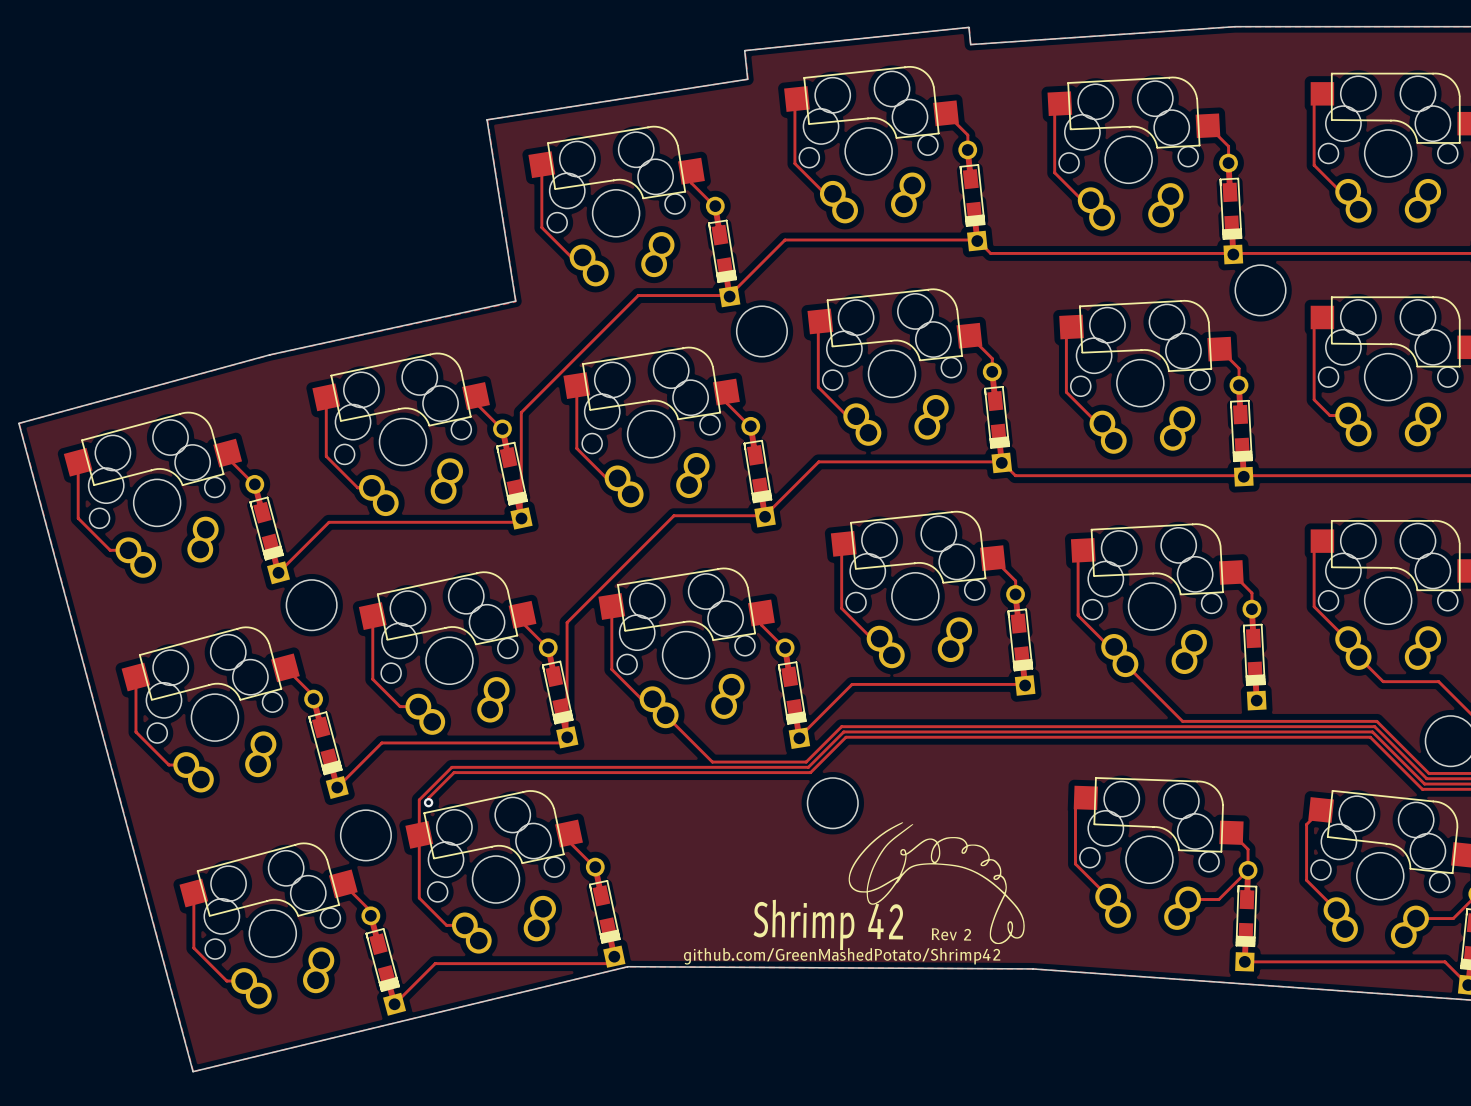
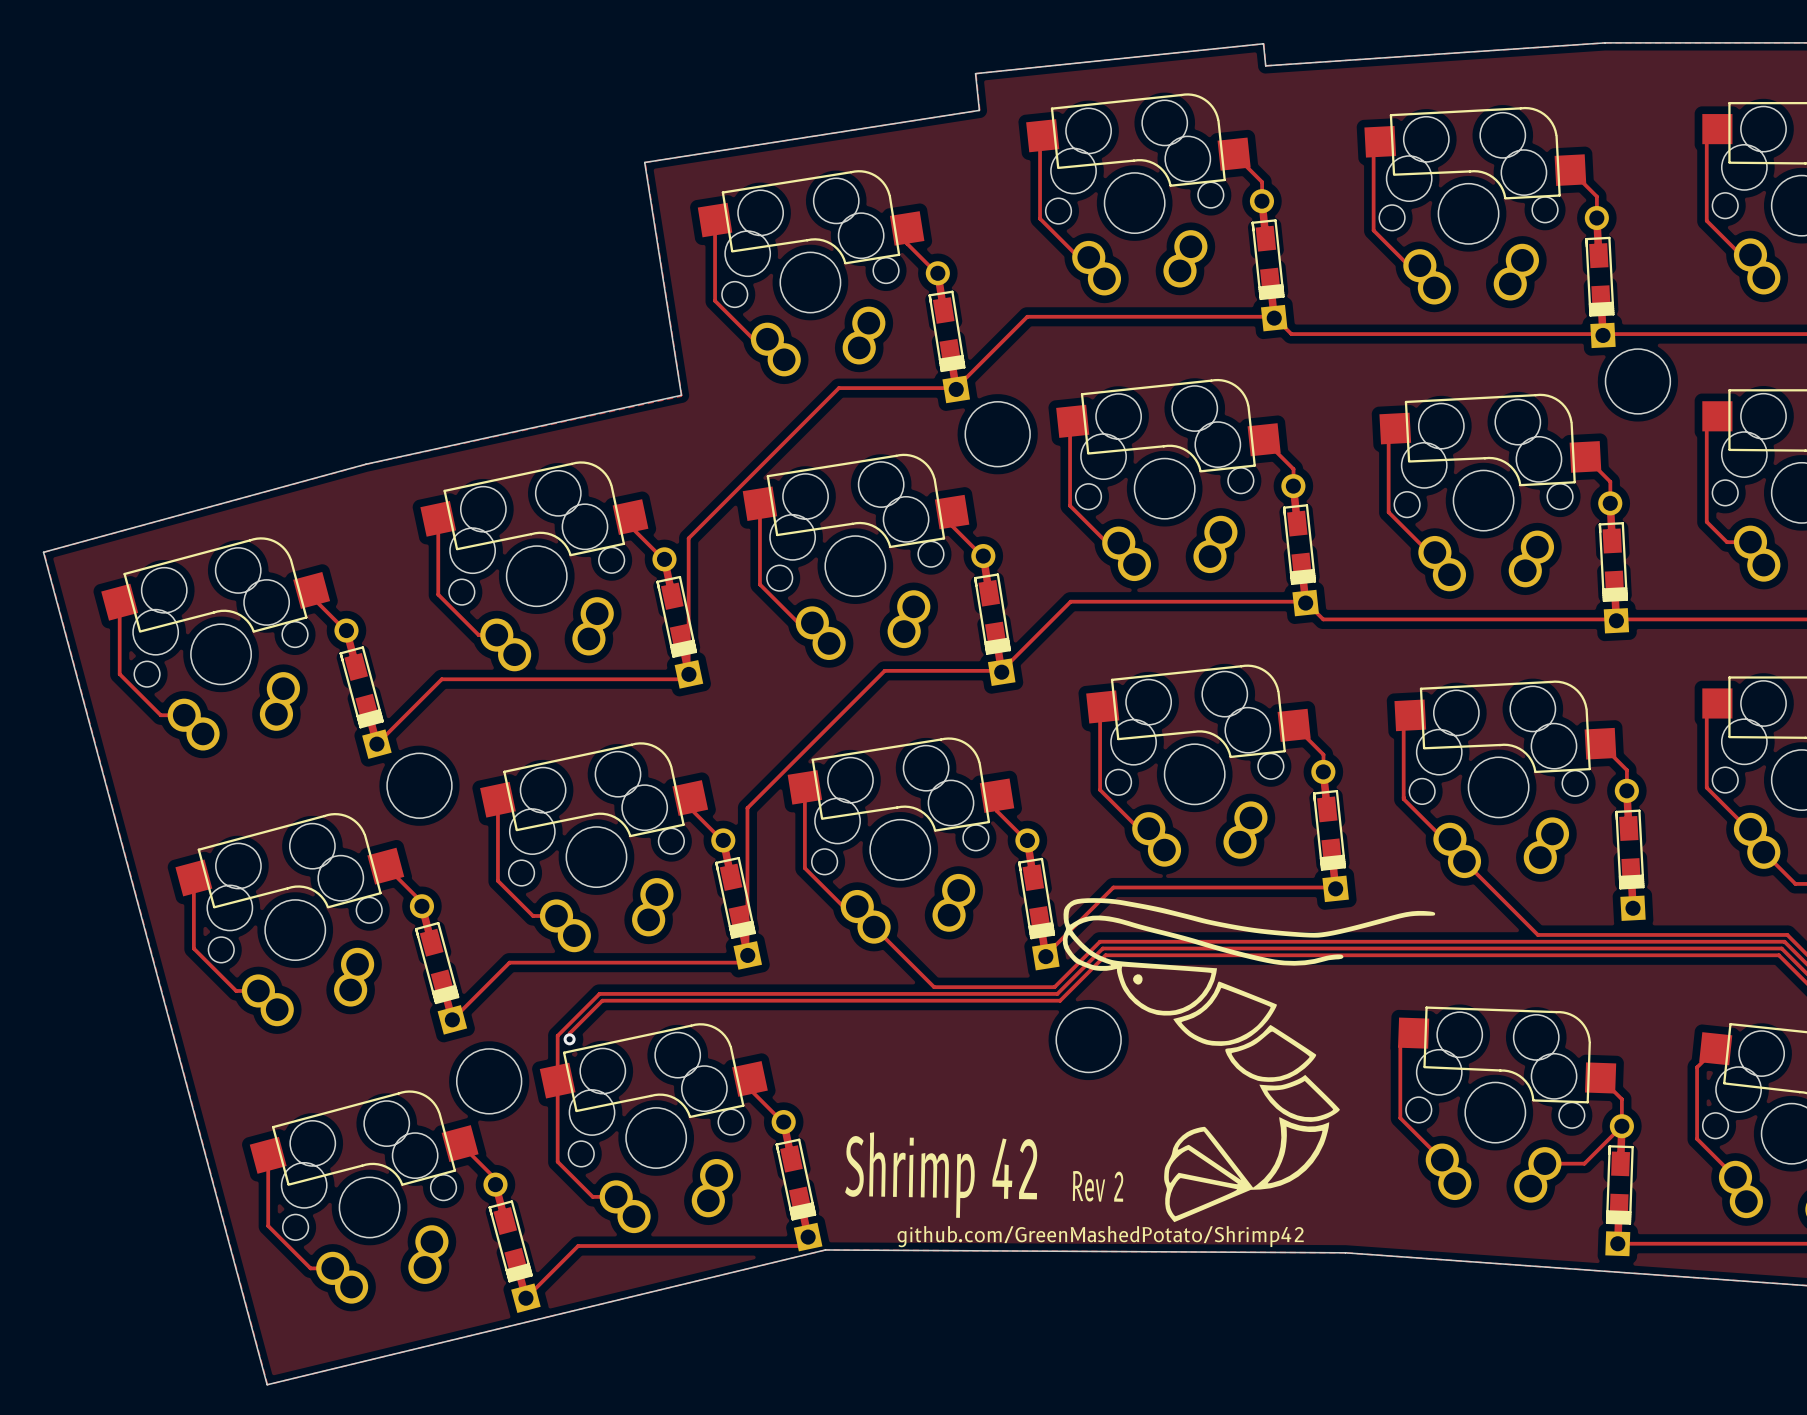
drawing: none -> [1062, 898, 1436, 1223]
drawing: [848, 822, 1025, 945] -> none
text: none -> Shrimp 42 (941, 1175)
text: Shrimp 42 (828, 924) -> Rev 2 (1098, 1186)
text: Rev 2 (951, 934) -> none

